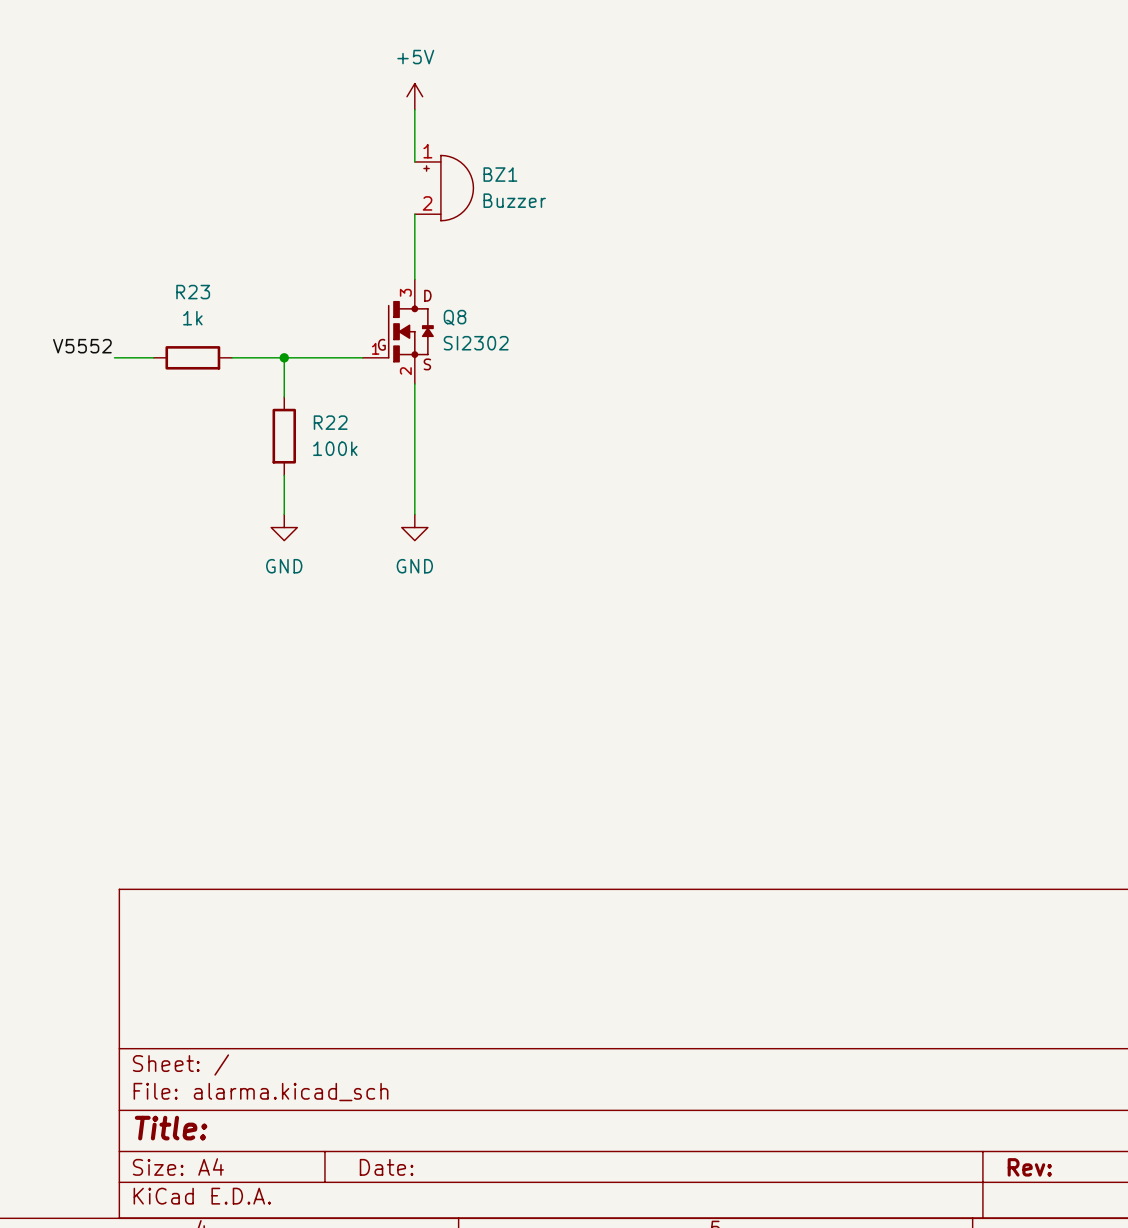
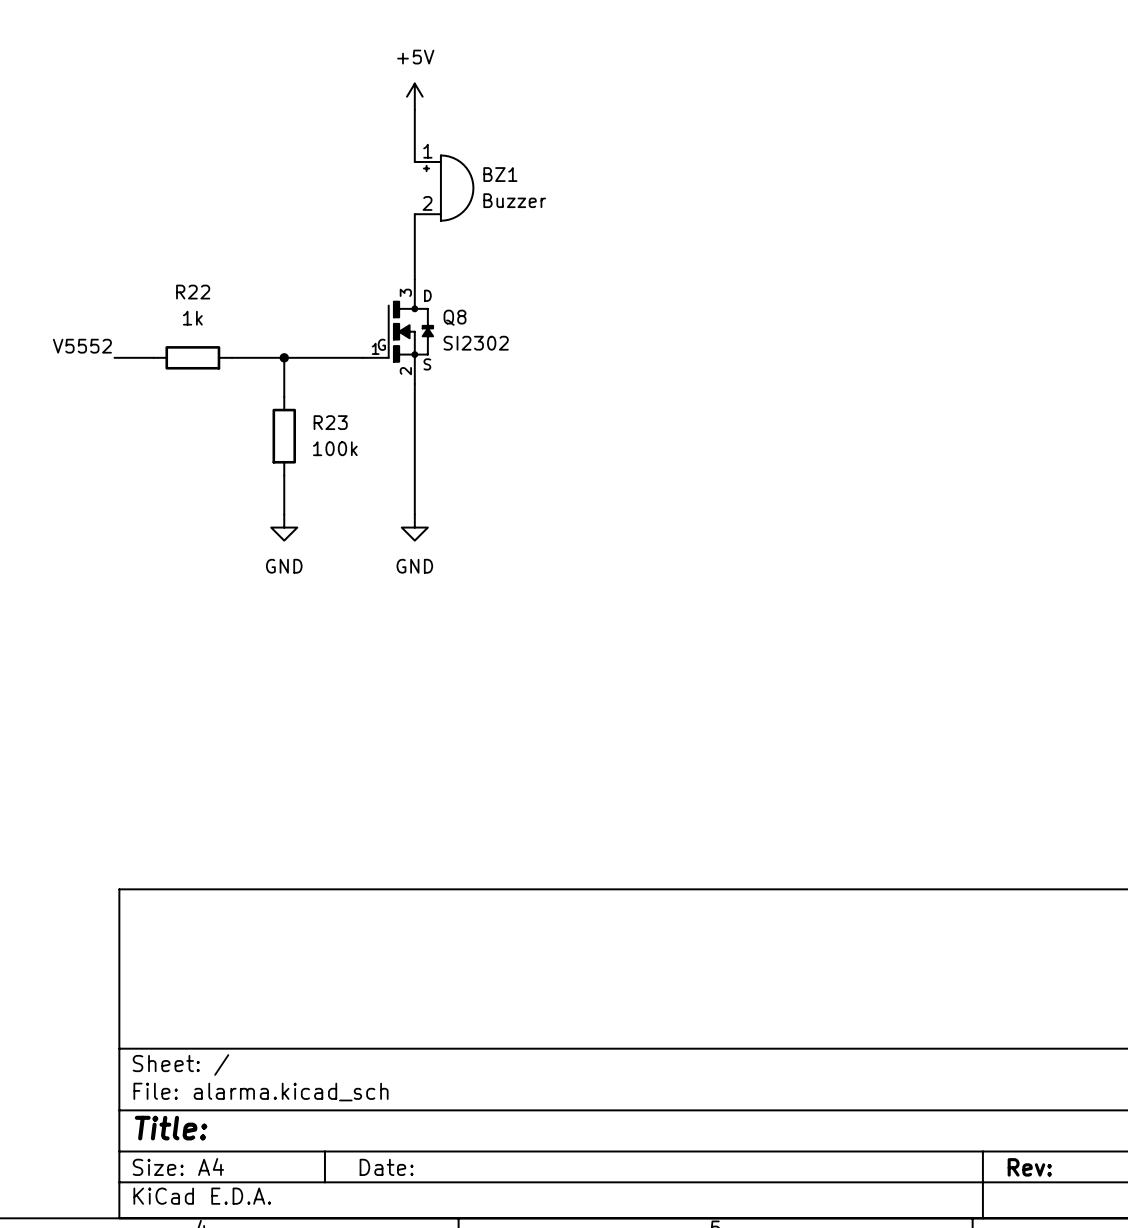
R23 name: R23 (193, 292) -> R22 (193, 292)
R22 name: R22 (330, 422) -> R23 (330, 422)

